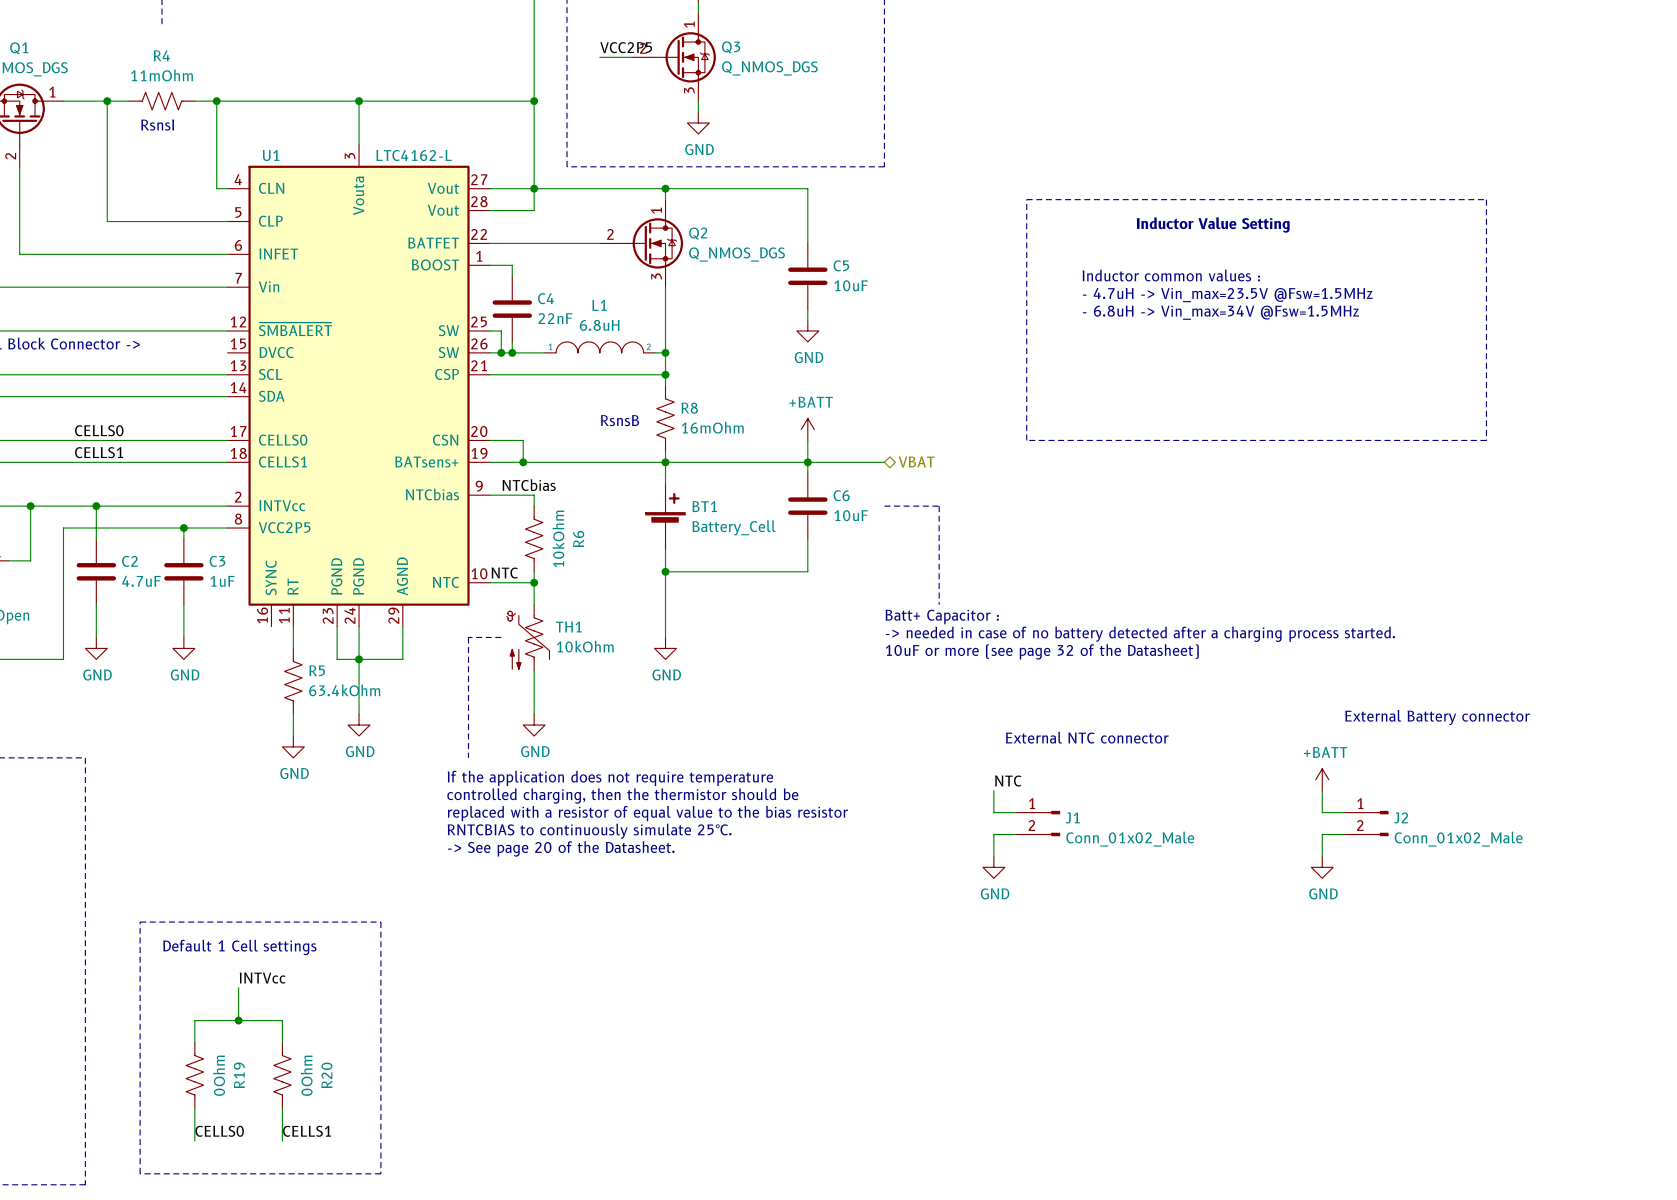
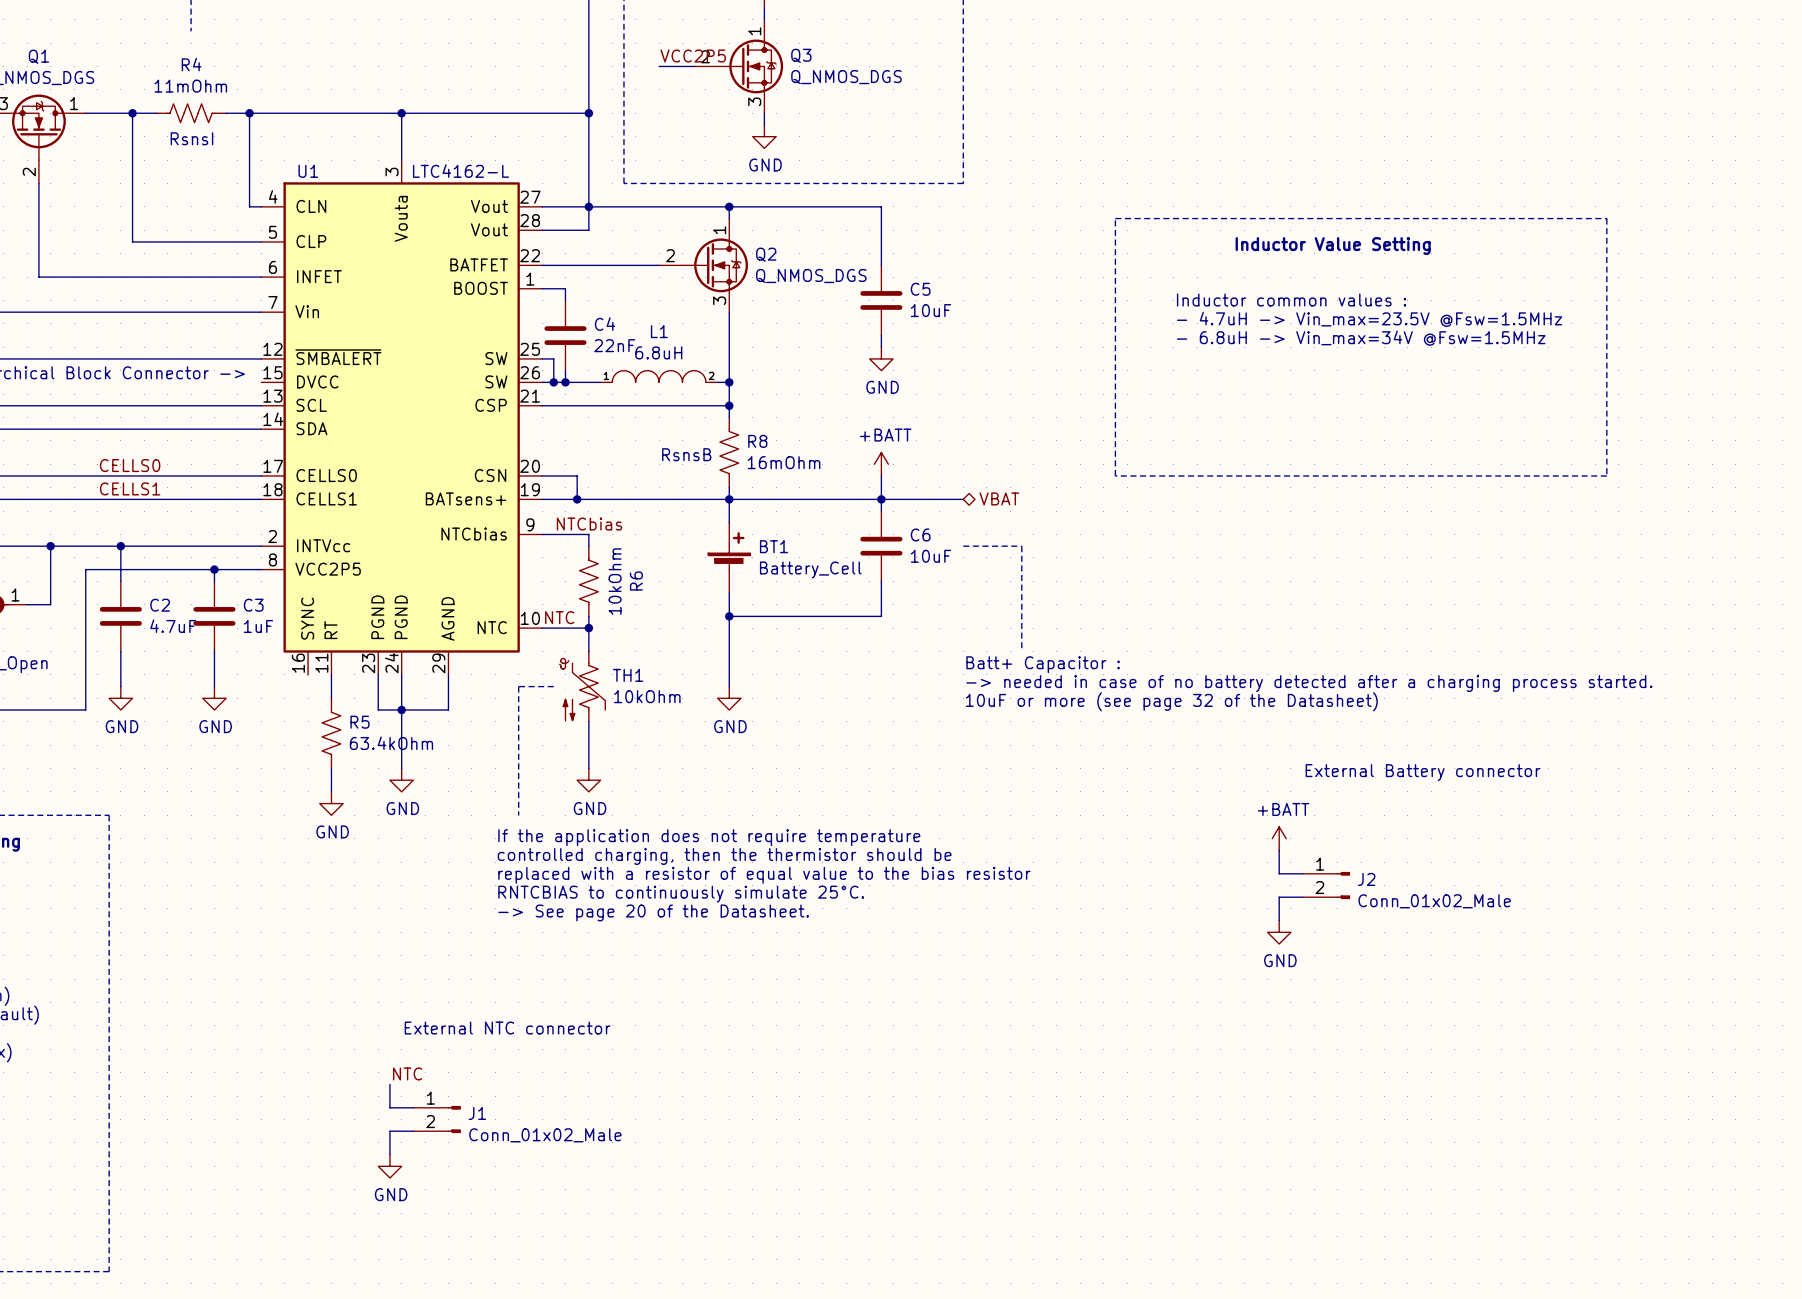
text position: External Battery connector (1437, 717) -> External Battery connector (1423, 772)
text: External NTC connector (1087, 737) -> none
power symbol position: +BATT (1322, 779) -> +BATT (1279, 838)
label: NTC (1008, 781) -> none
wire: (993, 790) (993, 812) (1015, 812) -> none
wire: (1322, 790) (1322, 812) (1344, 812) -> (1279, 850) (1279, 873) (1302, 873)
J1 position: (1038, 823) -> (437, 1119)
J2 position: (1366, 823) -> (1326, 885)
wire: (1015, 834) (993, 834) (993, 856) -> none
wire: (1344, 834) (1322, 834) (1322, 856) -> (1302, 897) (1279, 897) (1279, 920)
power symbol: GND (993, 867) -> none
power symbol: none -> GND (1279, 932)
power symbol: GND (1322, 867) -> none
line: (140, 922) (380, 922) (380, 1173) (140, 1173) (140, 922) -> none
text: Default 1 Cell settings (239, 947) -> none
text: none -> External NTC connector (507, 1028)
label: INTVcc (262, 978) -> none
wire: (238, 987) (238, 1020) -> none
label: none -> NTC (407, 1073)
wire: none -> (389, 1084) (389, 1107) (413, 1107)
junction: (238, 1020) -> none
wire: (194, 1042) (194, 1020) (282, 1020) (282, 1042) -> none
wire: none -> (413, 1131) (389, 1131) (389, 1154)
R19: 0Ohm (194, 1075) -> none
R20: 0Ohm (282, 1075) -> none
power symbol: none -> GND (389, 1166)
wire: (194, 1108) (194, 1140) -> none
wire: (282, 1108) (282, 1140) -> none
label: CELLS0 (219, 1131) -> none
label: CELLS1 (307, 1131) -> none

